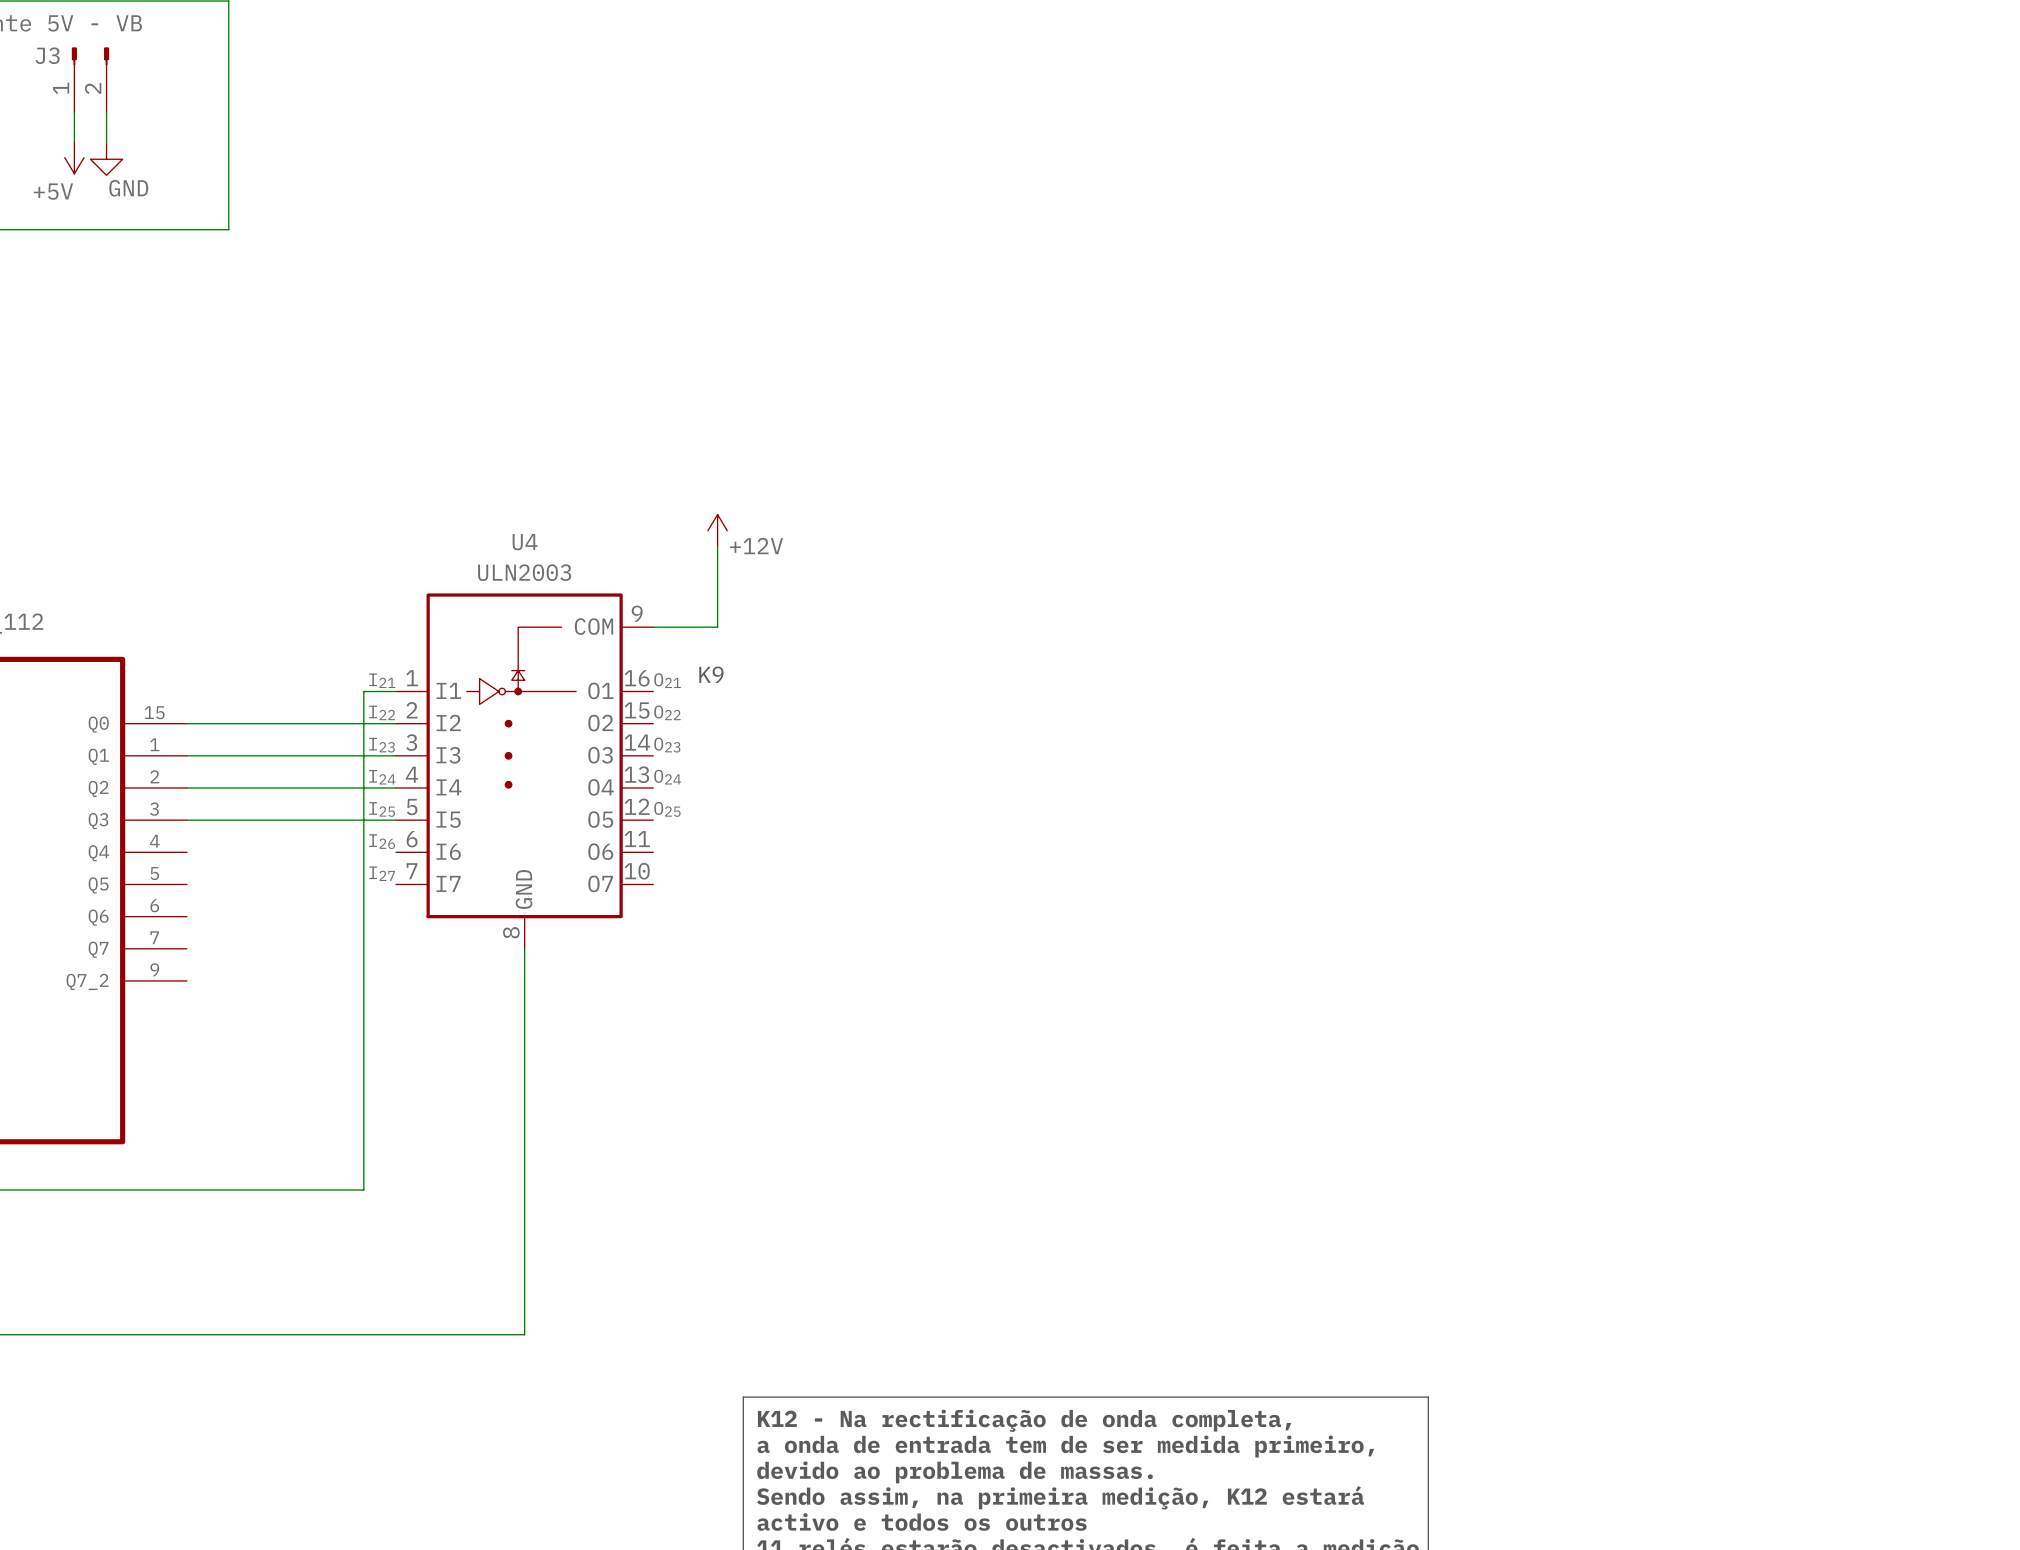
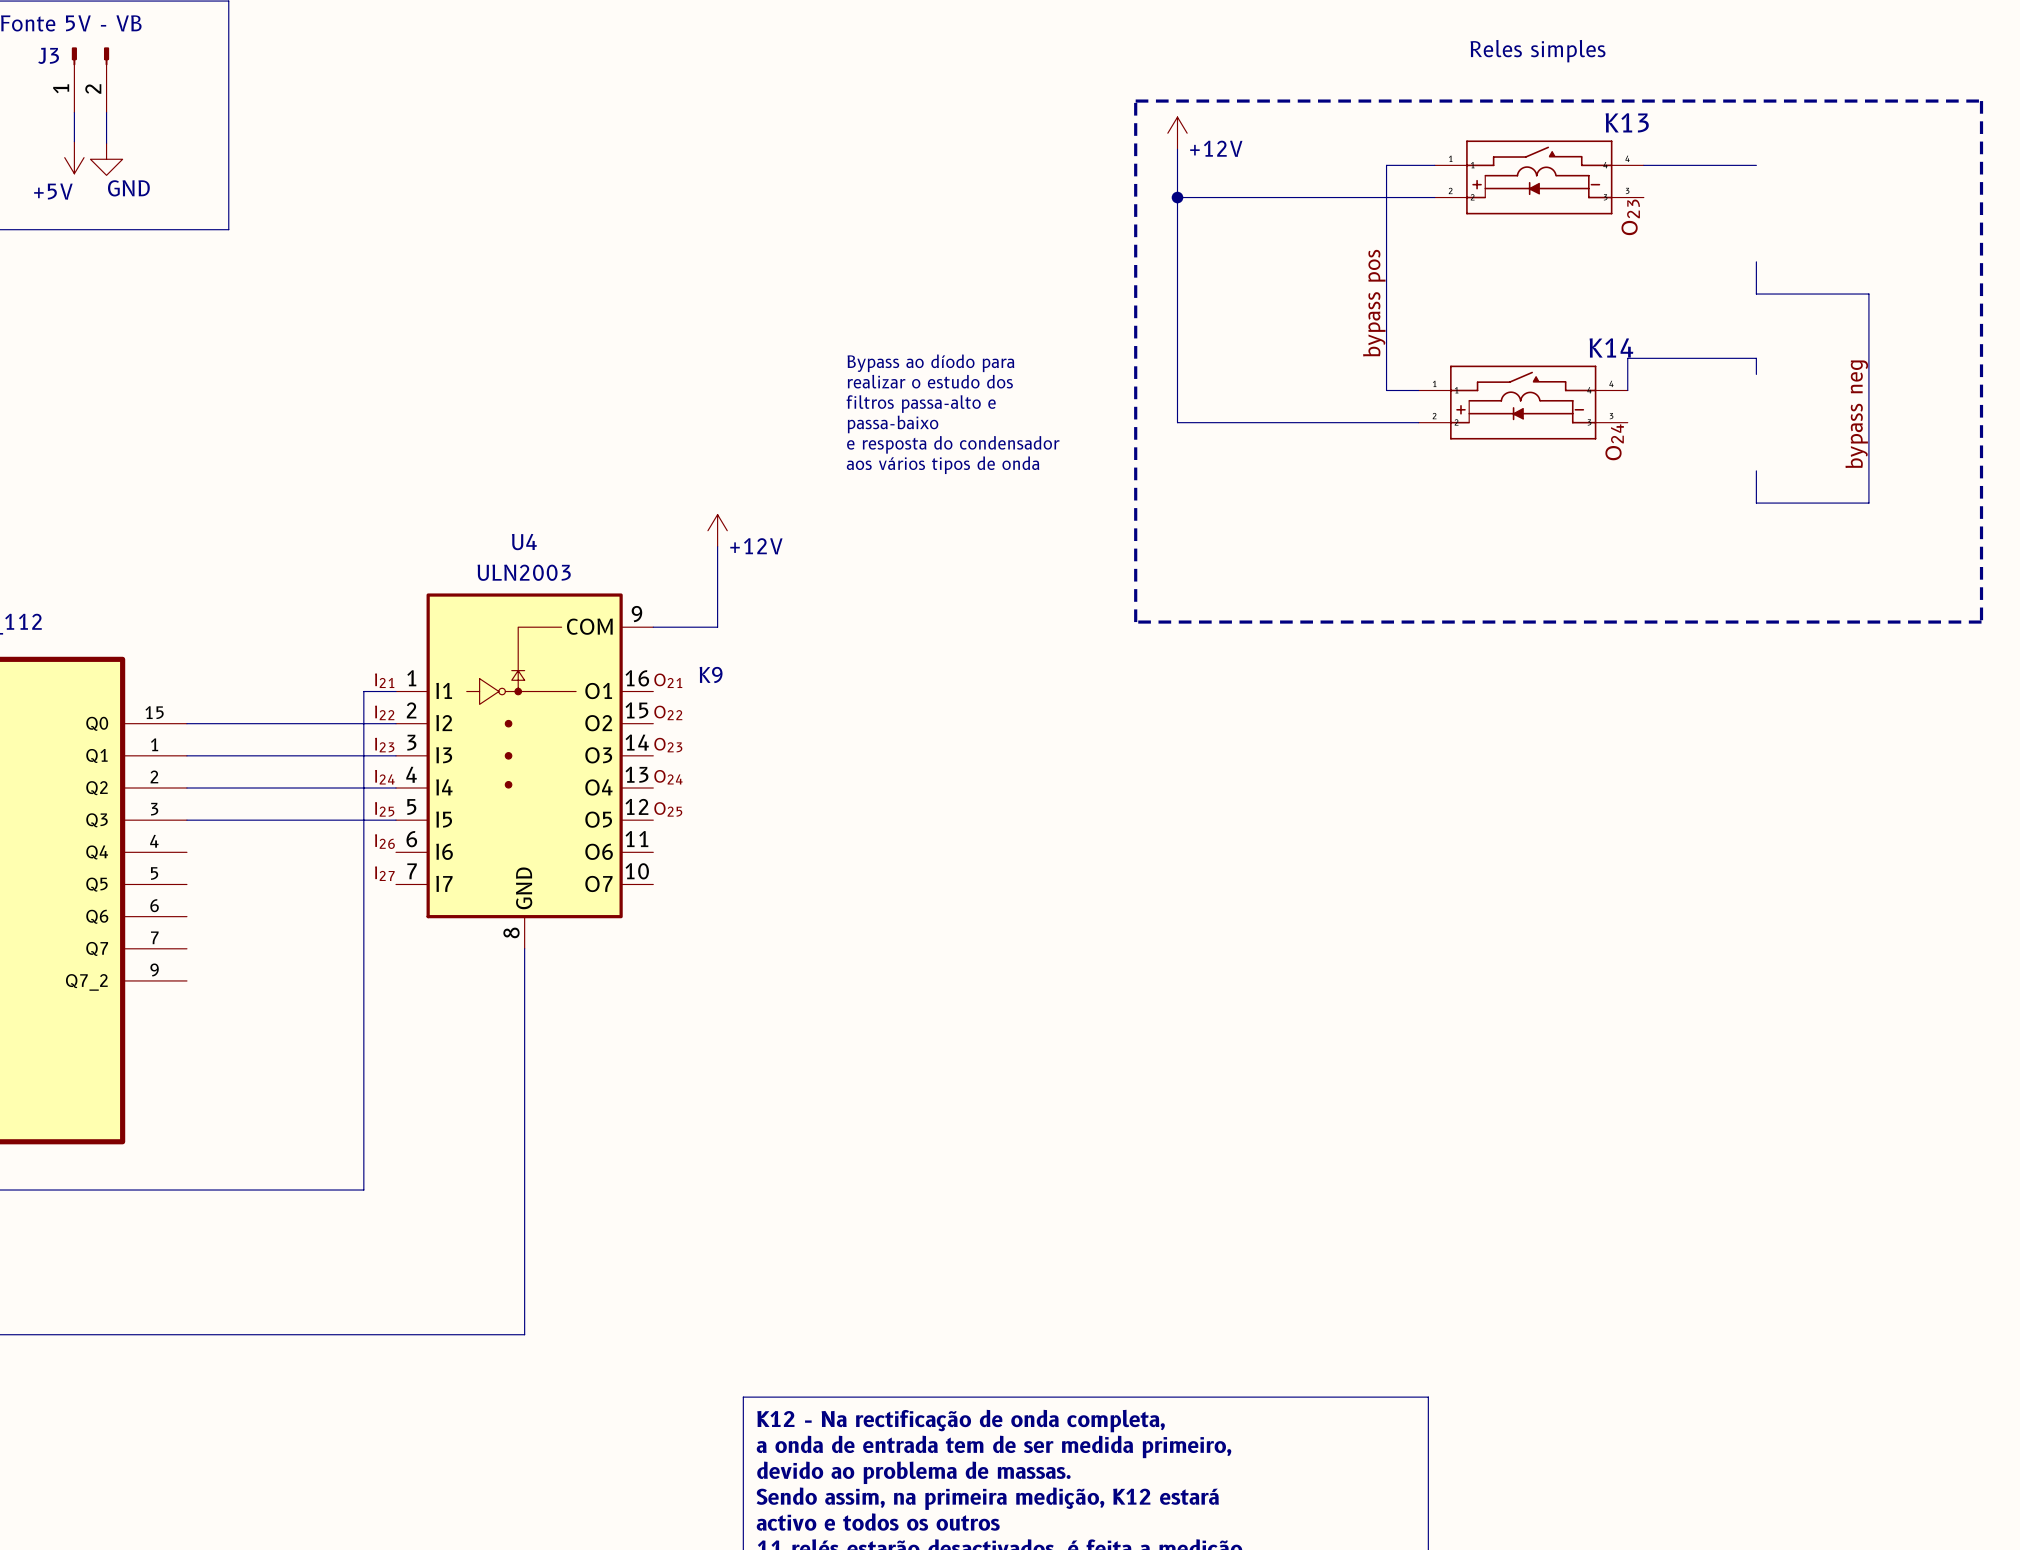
text: none -> Reles simples (1538, 51)
line: none -> (1135, 101) (1981, 101) (1981, 622) (1135, 622) (1135, 101)
power symbol: none -> +12V (1177, 133)
wire: none -> (1177, 149) (1177, 422) (1418, 422)
wire: none -> (1434, 165) (1386, 165) (1386, 390) (1418, 390)
wire: none -> (1643, 165) (1756, 165)
K13: none -> (1539, 177)
wire: none -> (1177, 197) (1434, 197)
junction: none -> (1177, 197)
label: none -> O23 (1630, 217)
wire: none -> (1756, 261) (1756, 294) (1868, 294) (1868, 503) (1756, 503) (1756, 470)
label: none -> bypass pos (1374, 303)
text: none -> Bypass ao díodo para (930, 363)
wire: none -> (1756, 374) (1756, 358) (1627, 358) (1627, 390)
text: none -> realizar o estudo dos (930, 381)
K14: none -> (1523, 402)
text: none -> filtros passa-alto e (921, 404)
text: none -> passa-baixo (893, 424)
label: none -> bypass neg (1856, 414)
label: none -> O24 (1614, 442)
text: none -> e resposta do condensador (953, 444)
text: none -> aos vários tipos de onda (943, 465)

